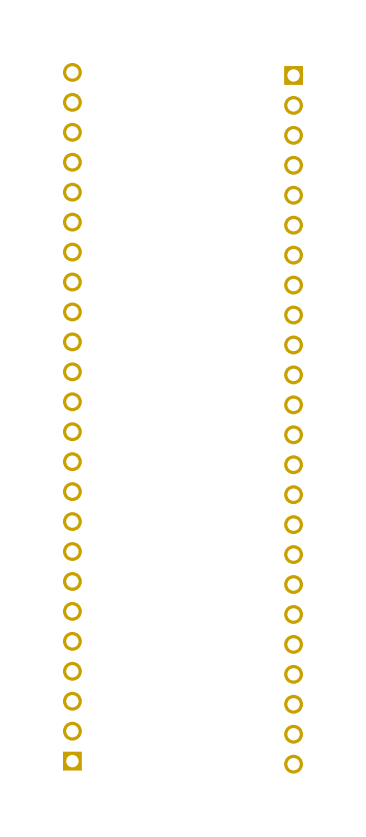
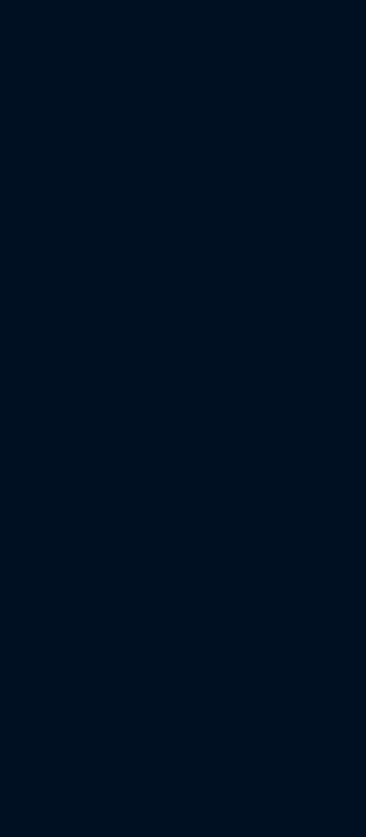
part: (72, 416) -> none
part: (293, 419) -> none

